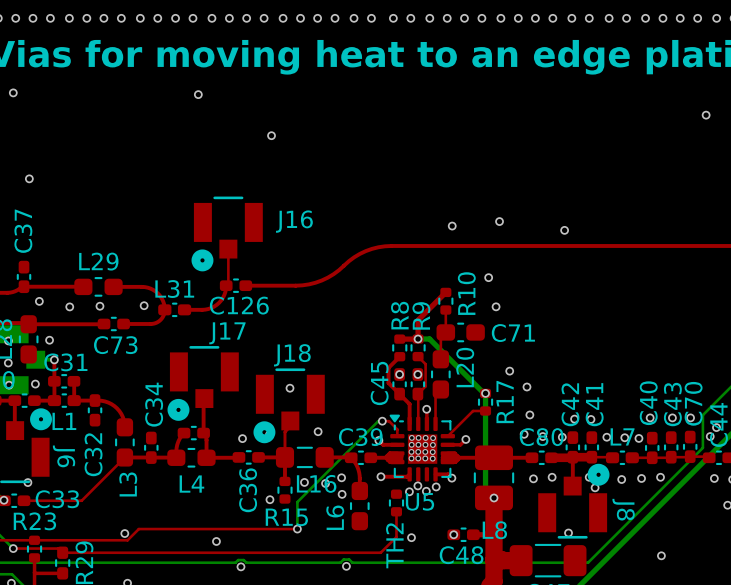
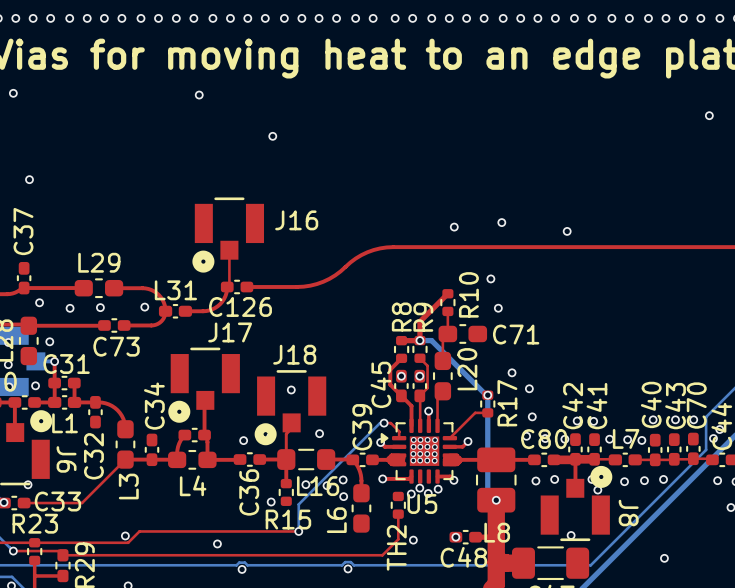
U5 footprint: [389, 414, 455, 482] -> [380, 418, 458, 484]
C39 name rotation: 0° (360, 437) -> 90° counterclockwise (362, 427)

